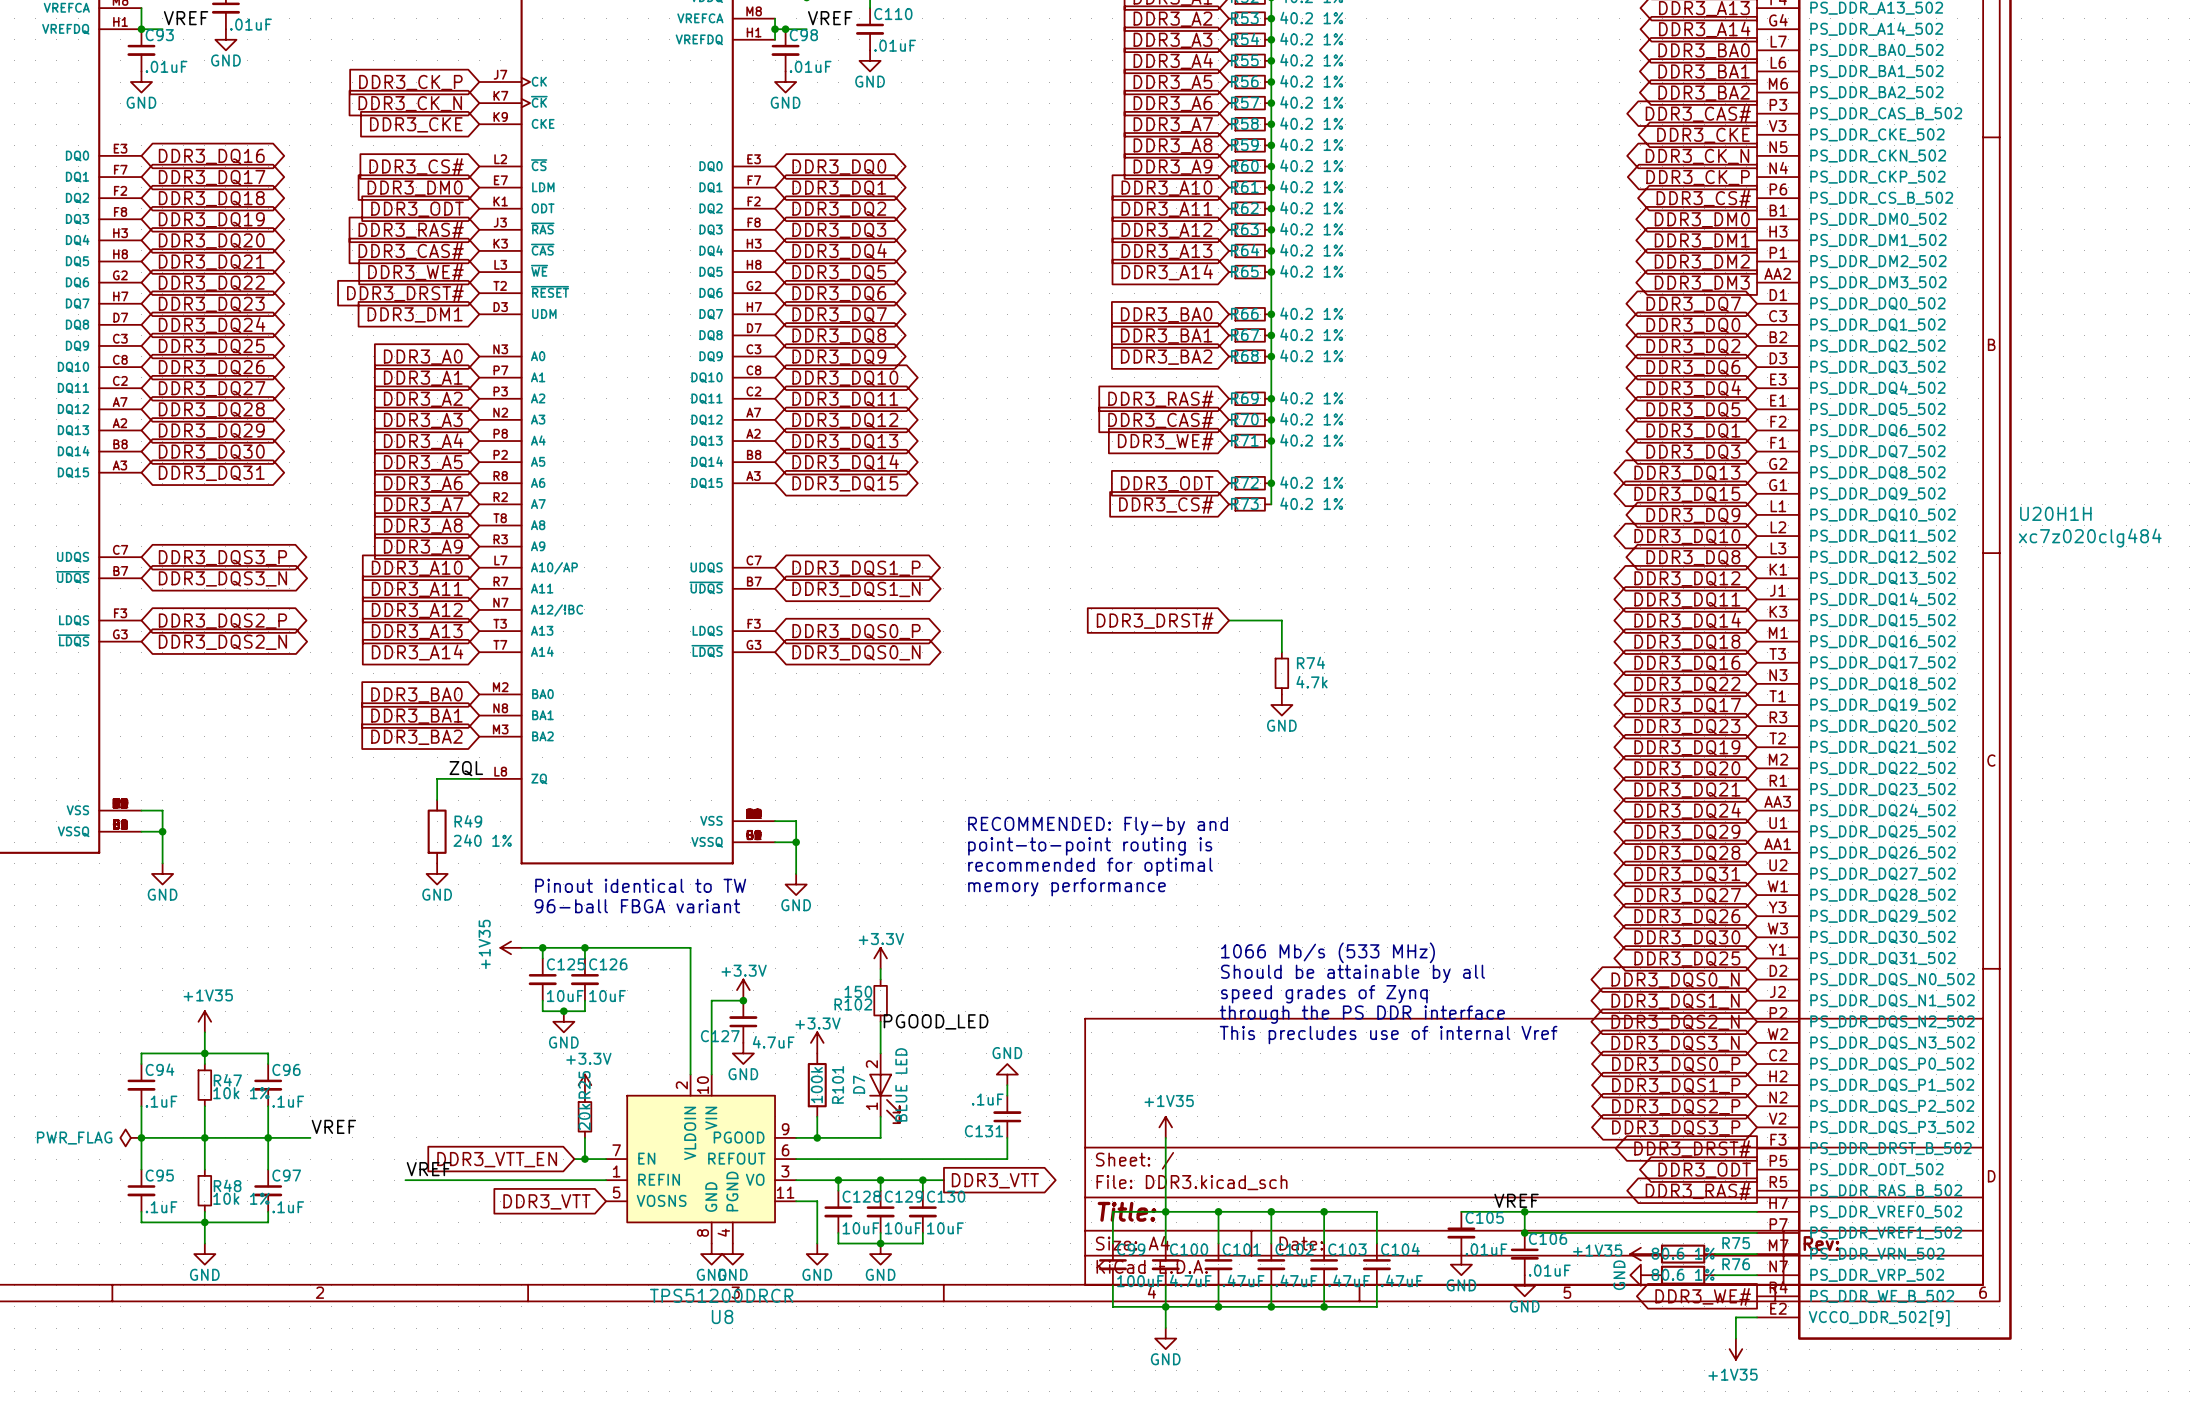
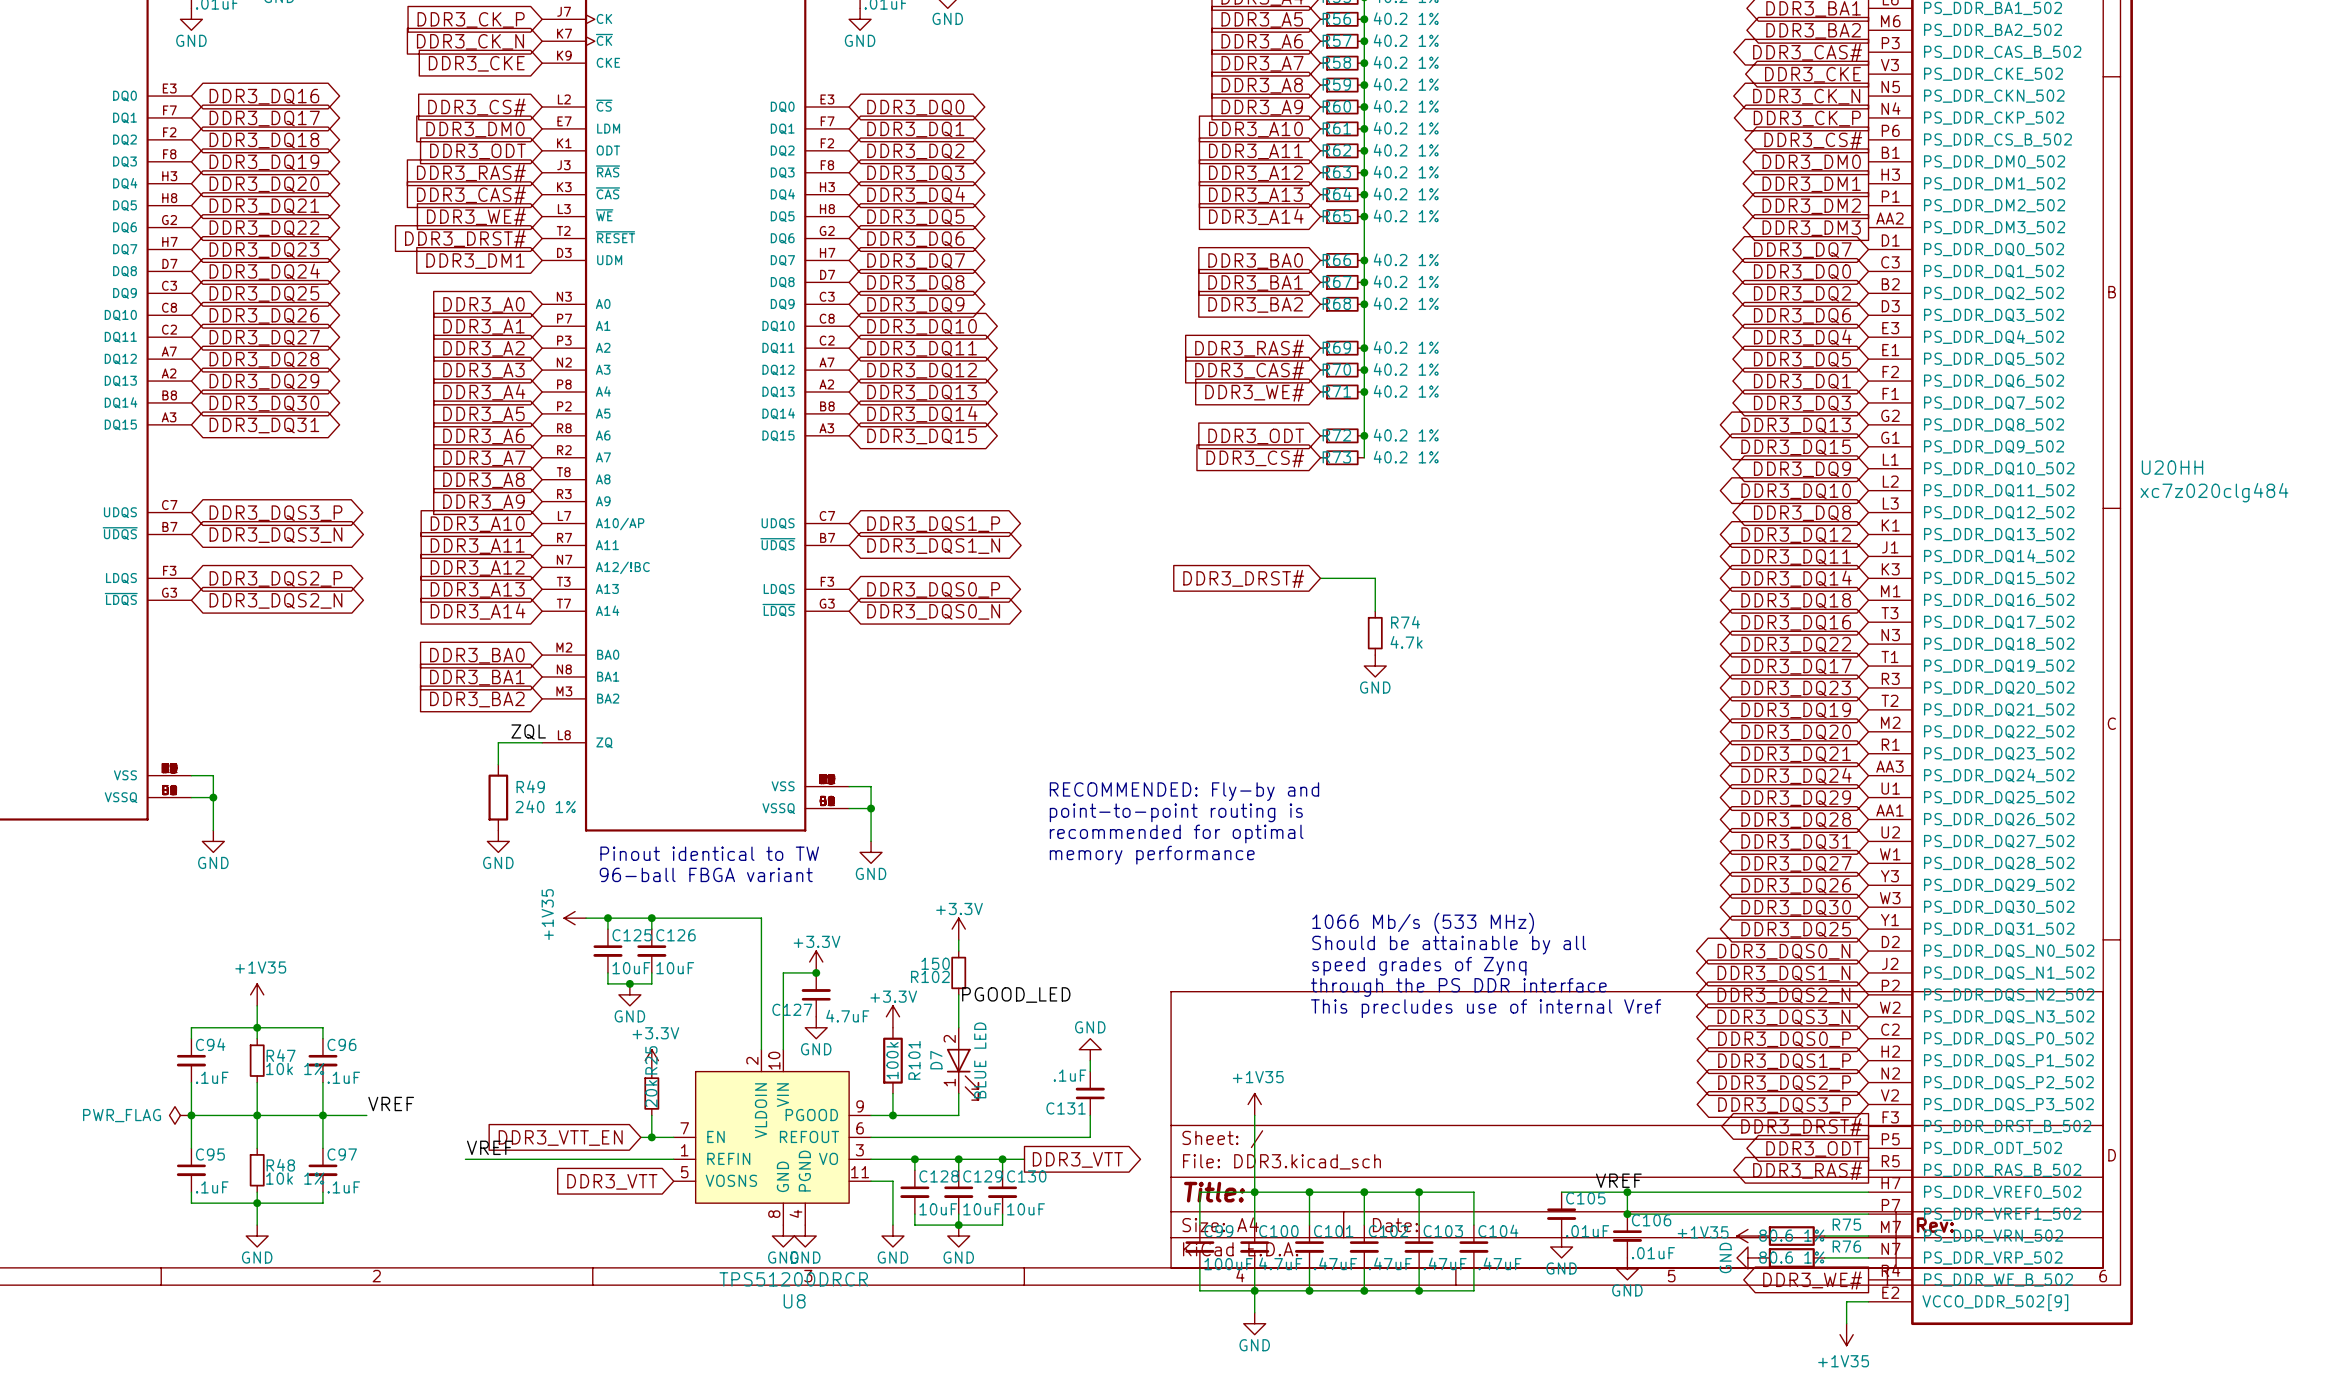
U20H1H name: U20H1H (2055, 513) -> U20HH (2172, 467)

